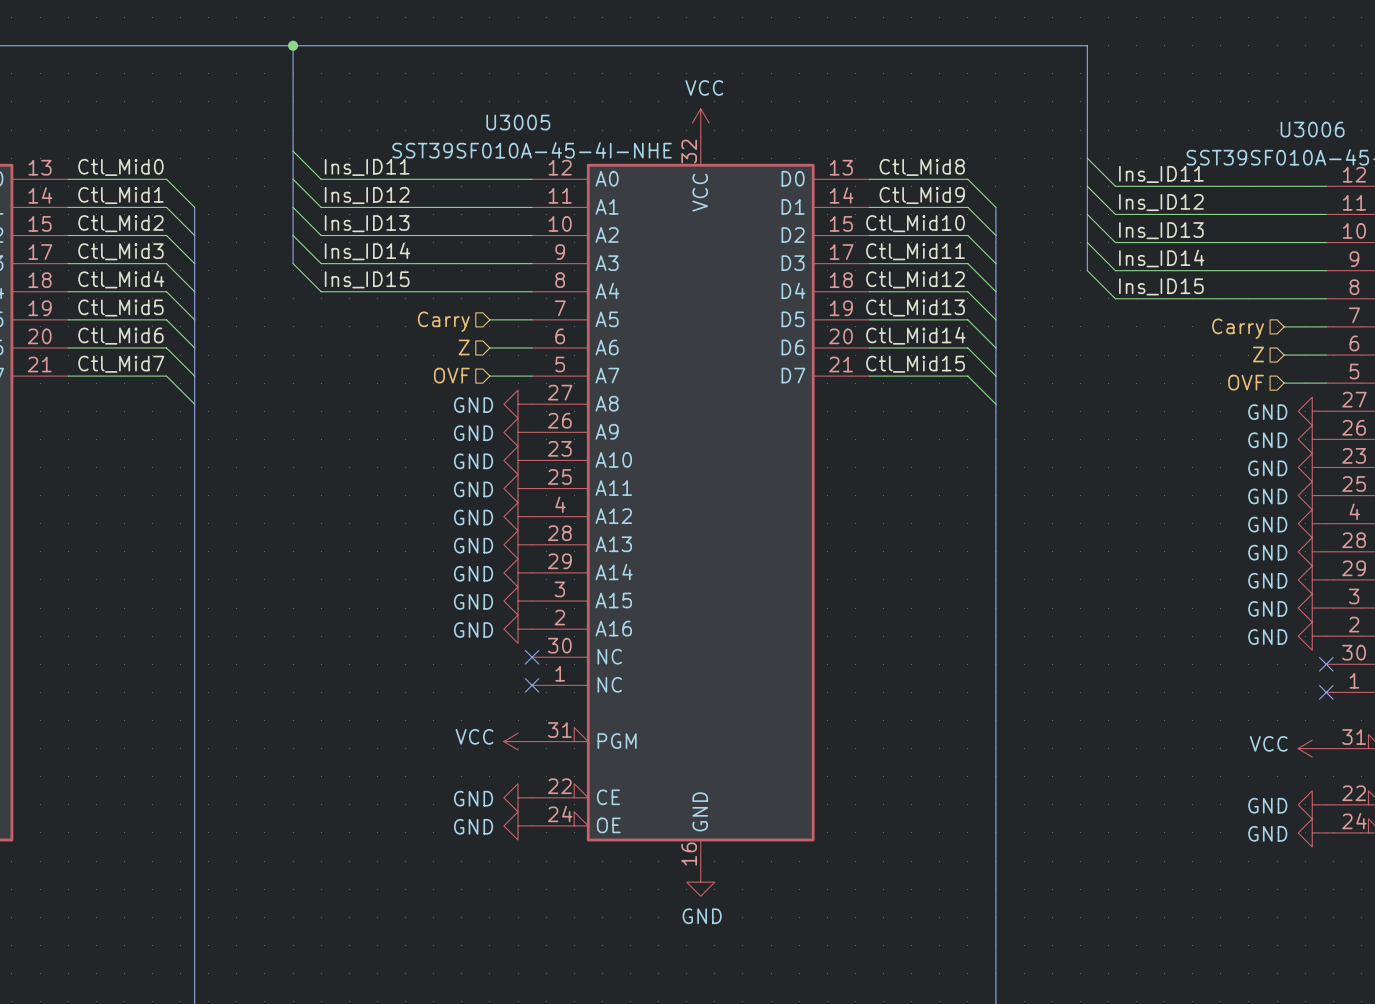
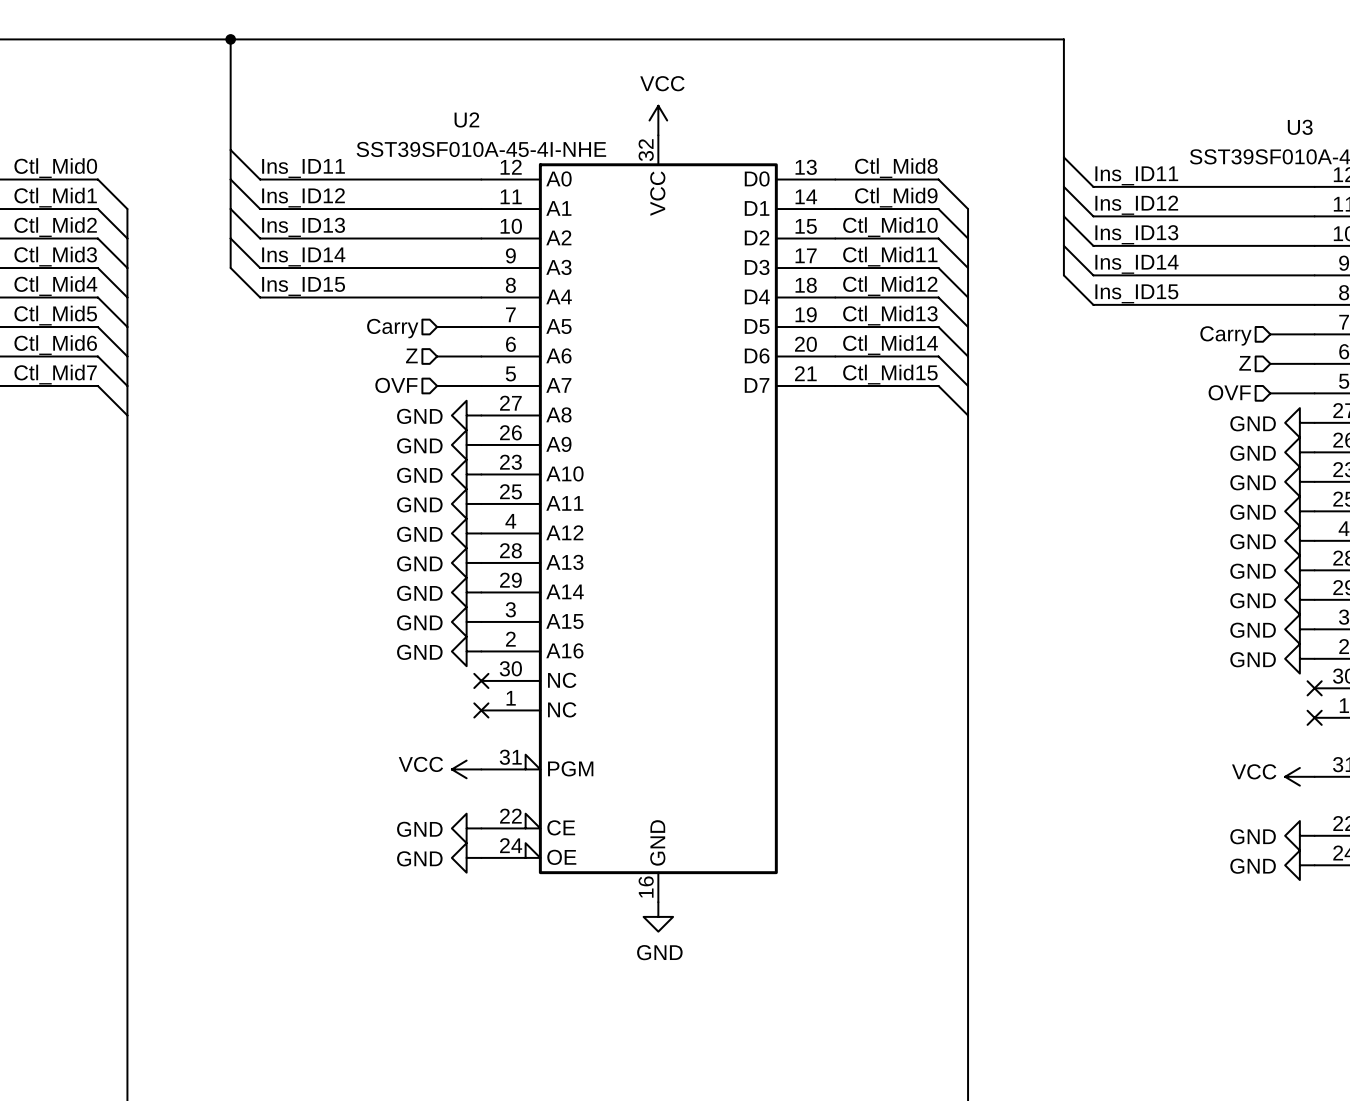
U3005 name: U3005 (518, 122) -> U2 (466, 119)
U3006 name: U3006 (1312, 129) -> U3 (1300, 127)

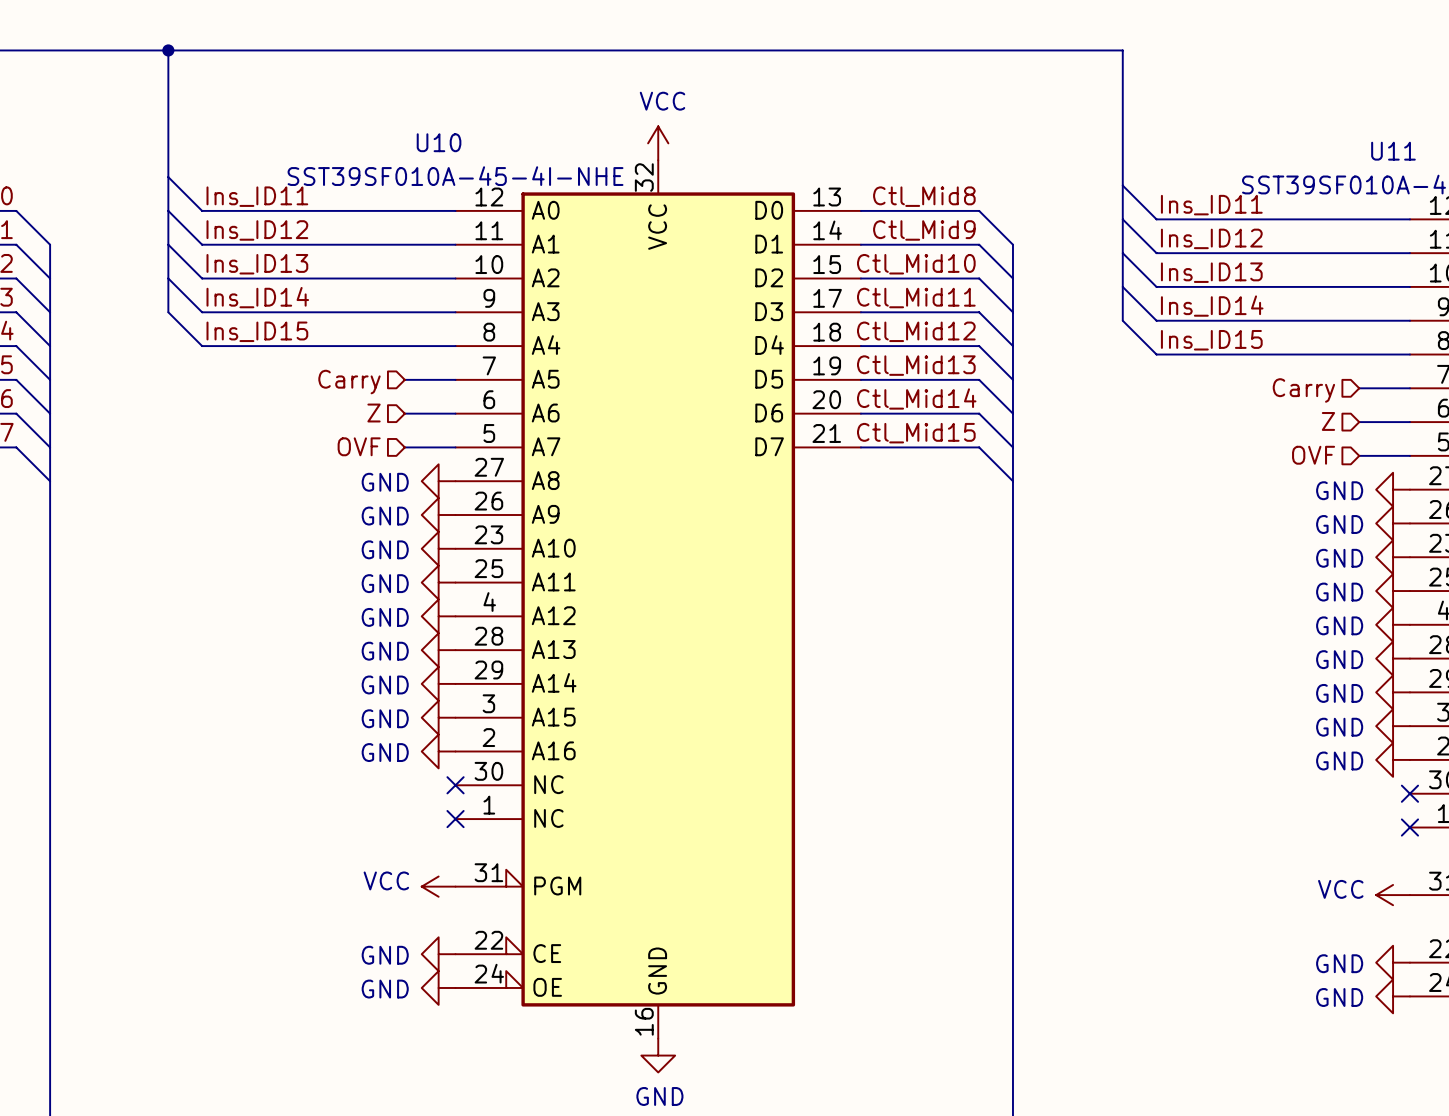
U2 name: U2 (466, 119) -> U10 (439, 142)
U3 name: U3 (1300, 127) -> U11 (1393, 151)

